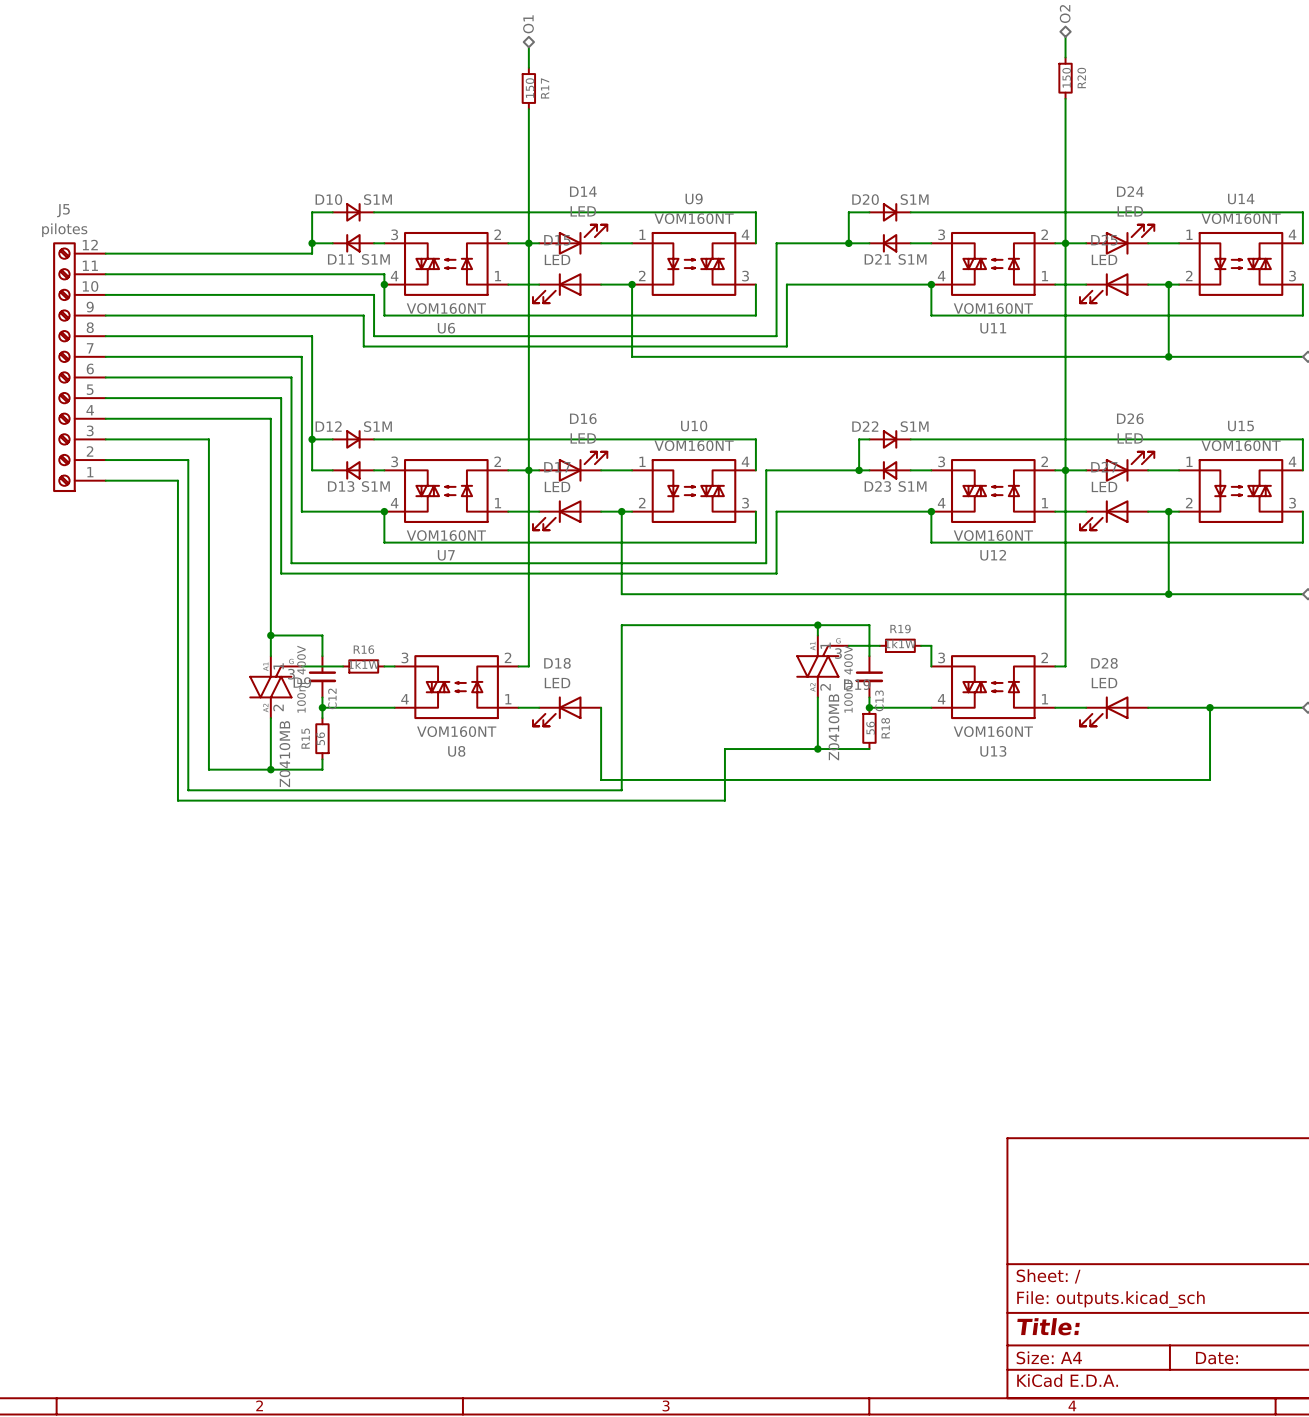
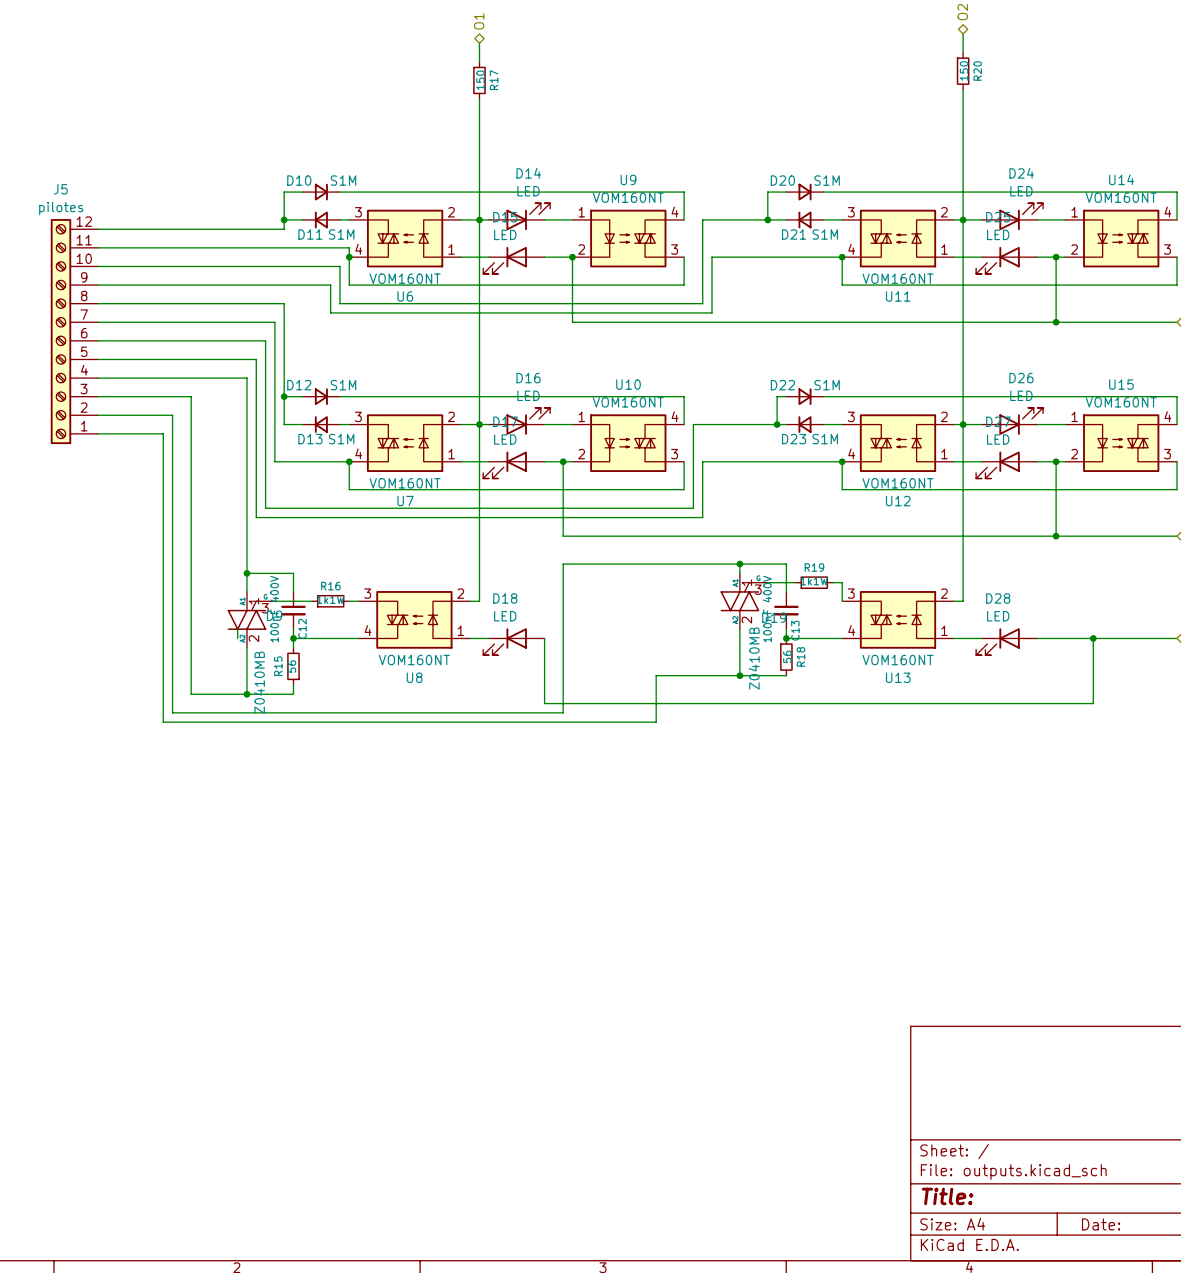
wire: none -> (237, 629) (237, 638)

